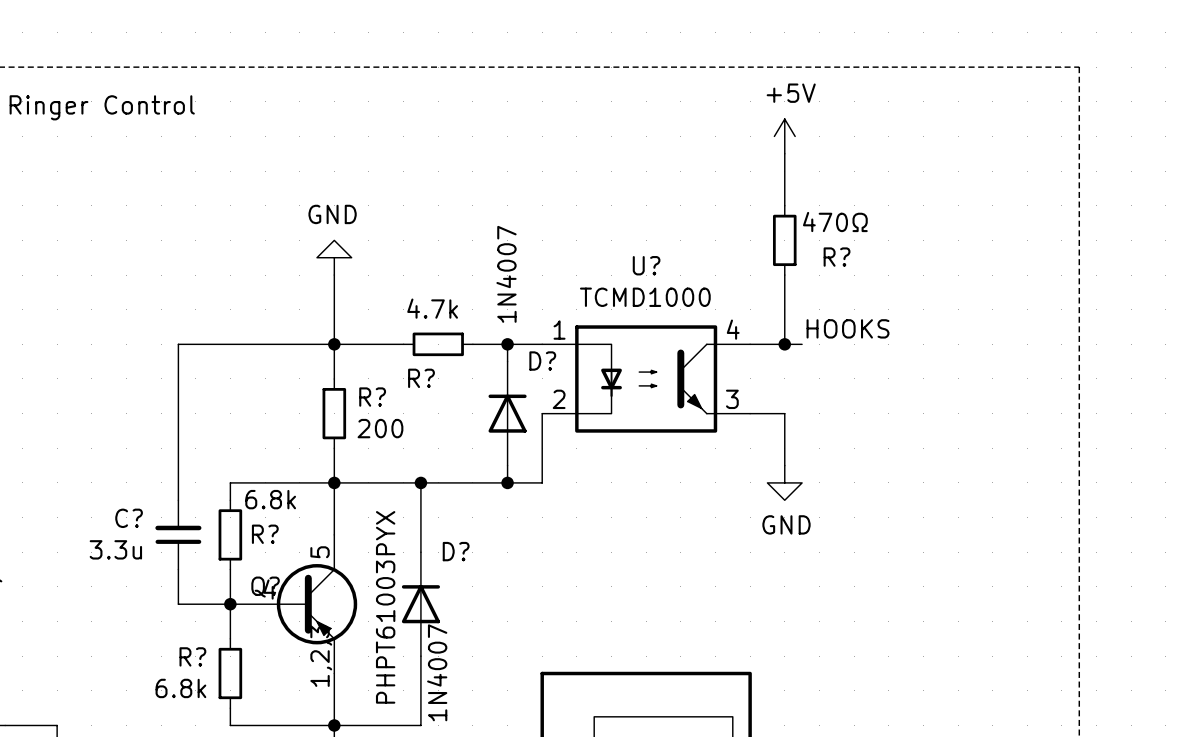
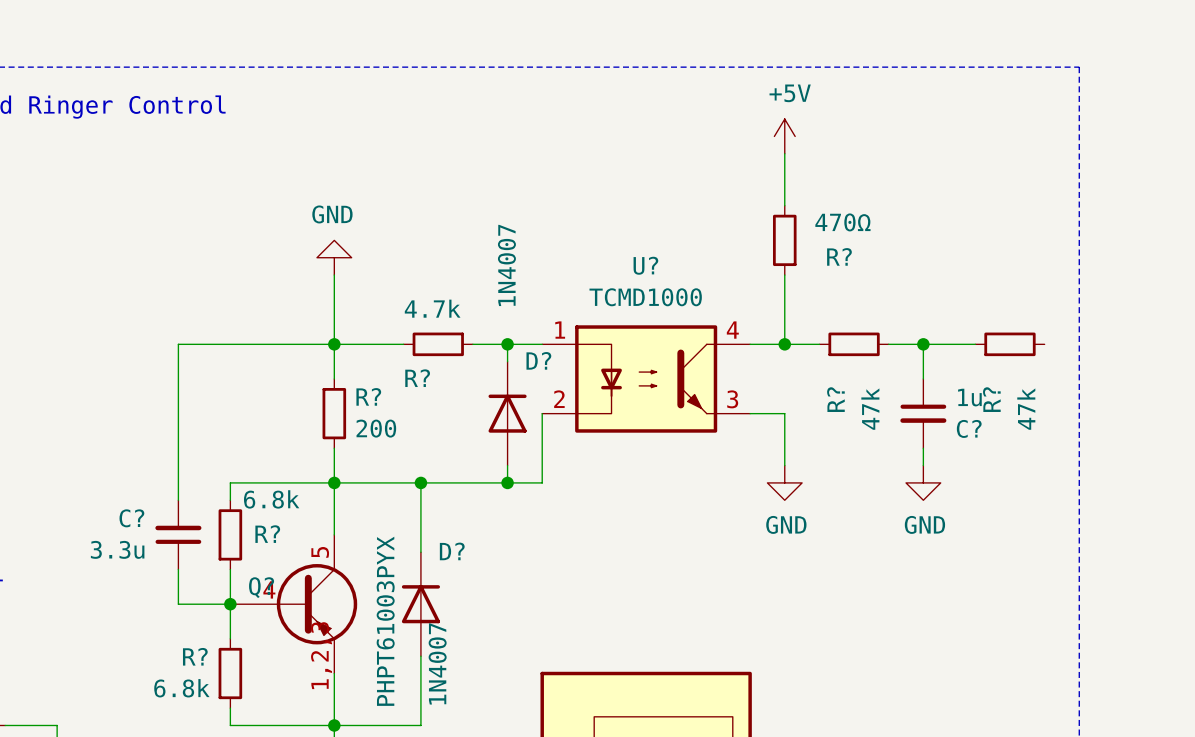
label: HOOKS (848, 328) -> none
wire: none -> (802, 344) (819, 344)
R?: none -> 47k (854, 344)
wire: none -> (888, 344) (975, 344)
wire: none -> (923, 344) (923, 378)
junction: none -> (923, 344)
R?: none -> 47k (1009, 344)
C?: none -> 1u (923, 413)
wire: none -> (923, 448) (923, 465)
power symbol: none -> GND (923, 482)

